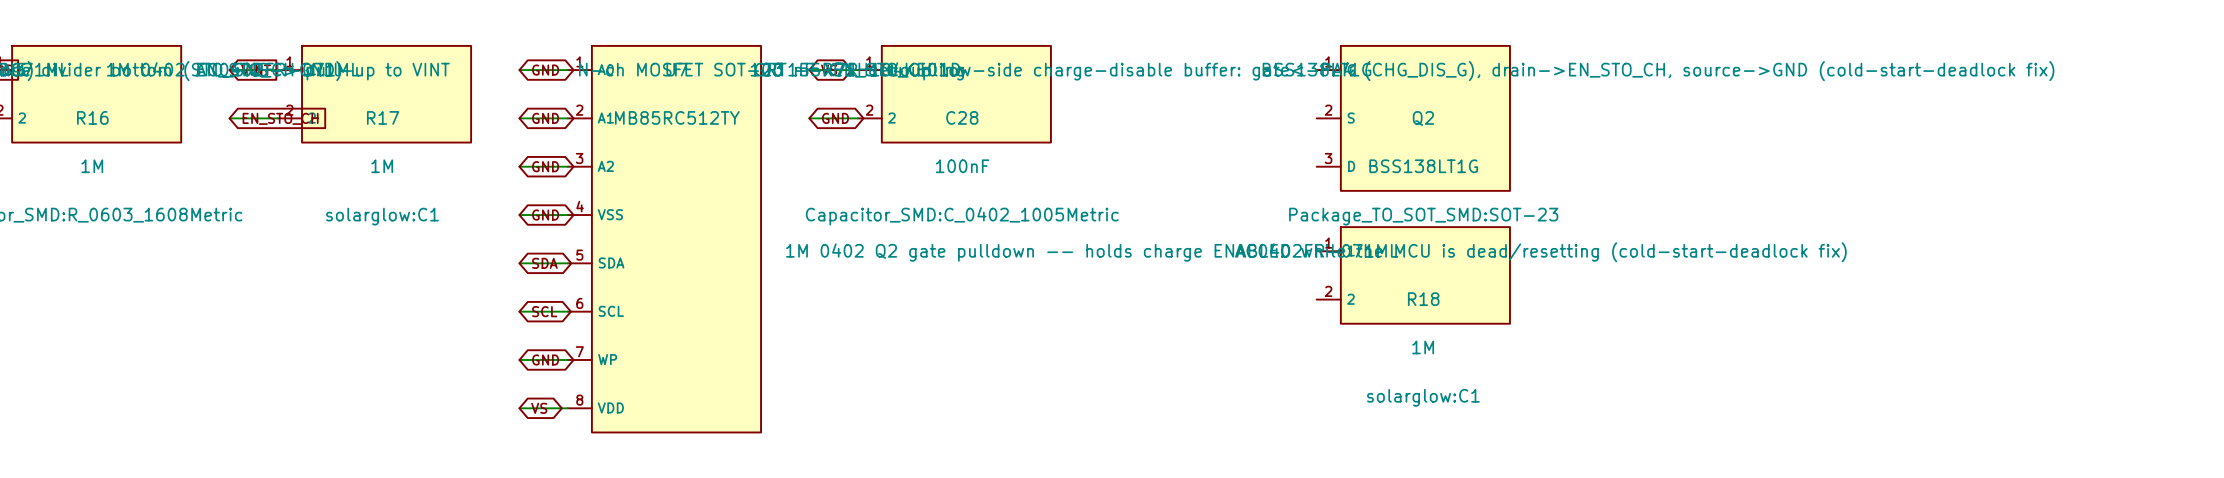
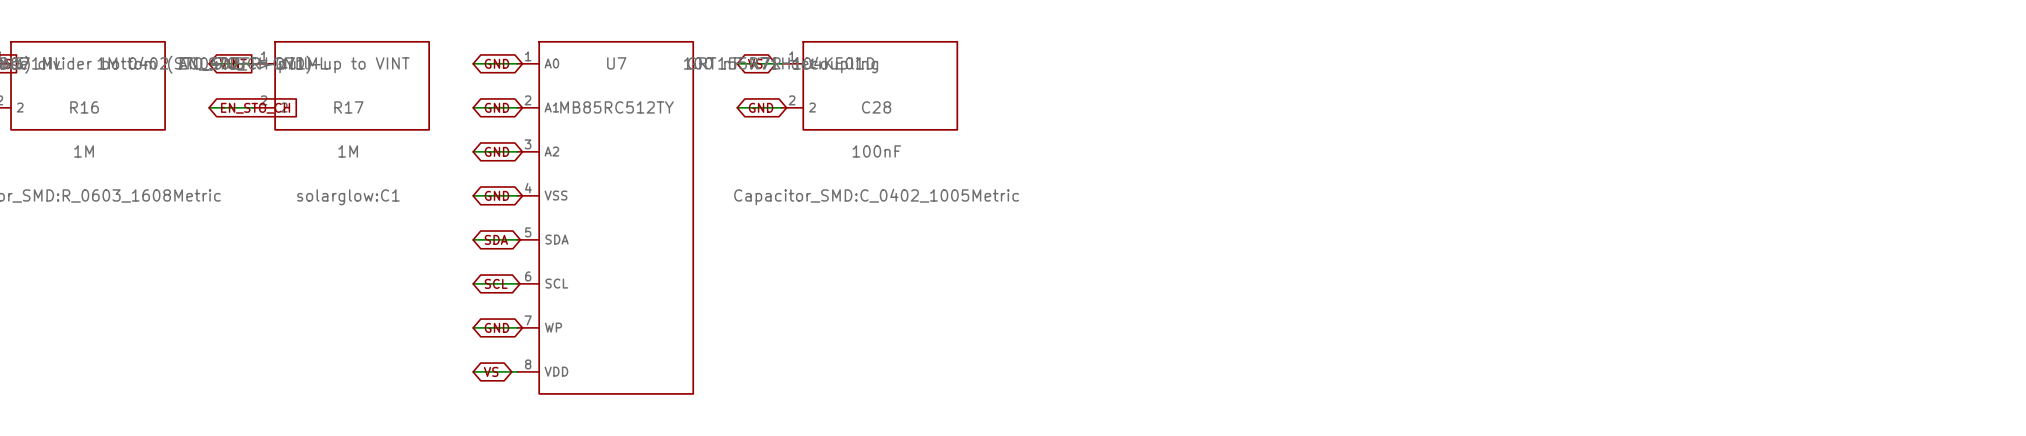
Q2: BSS138LT1G (1413, 118) -> none
R18: 1M (1413, 275) -> none

